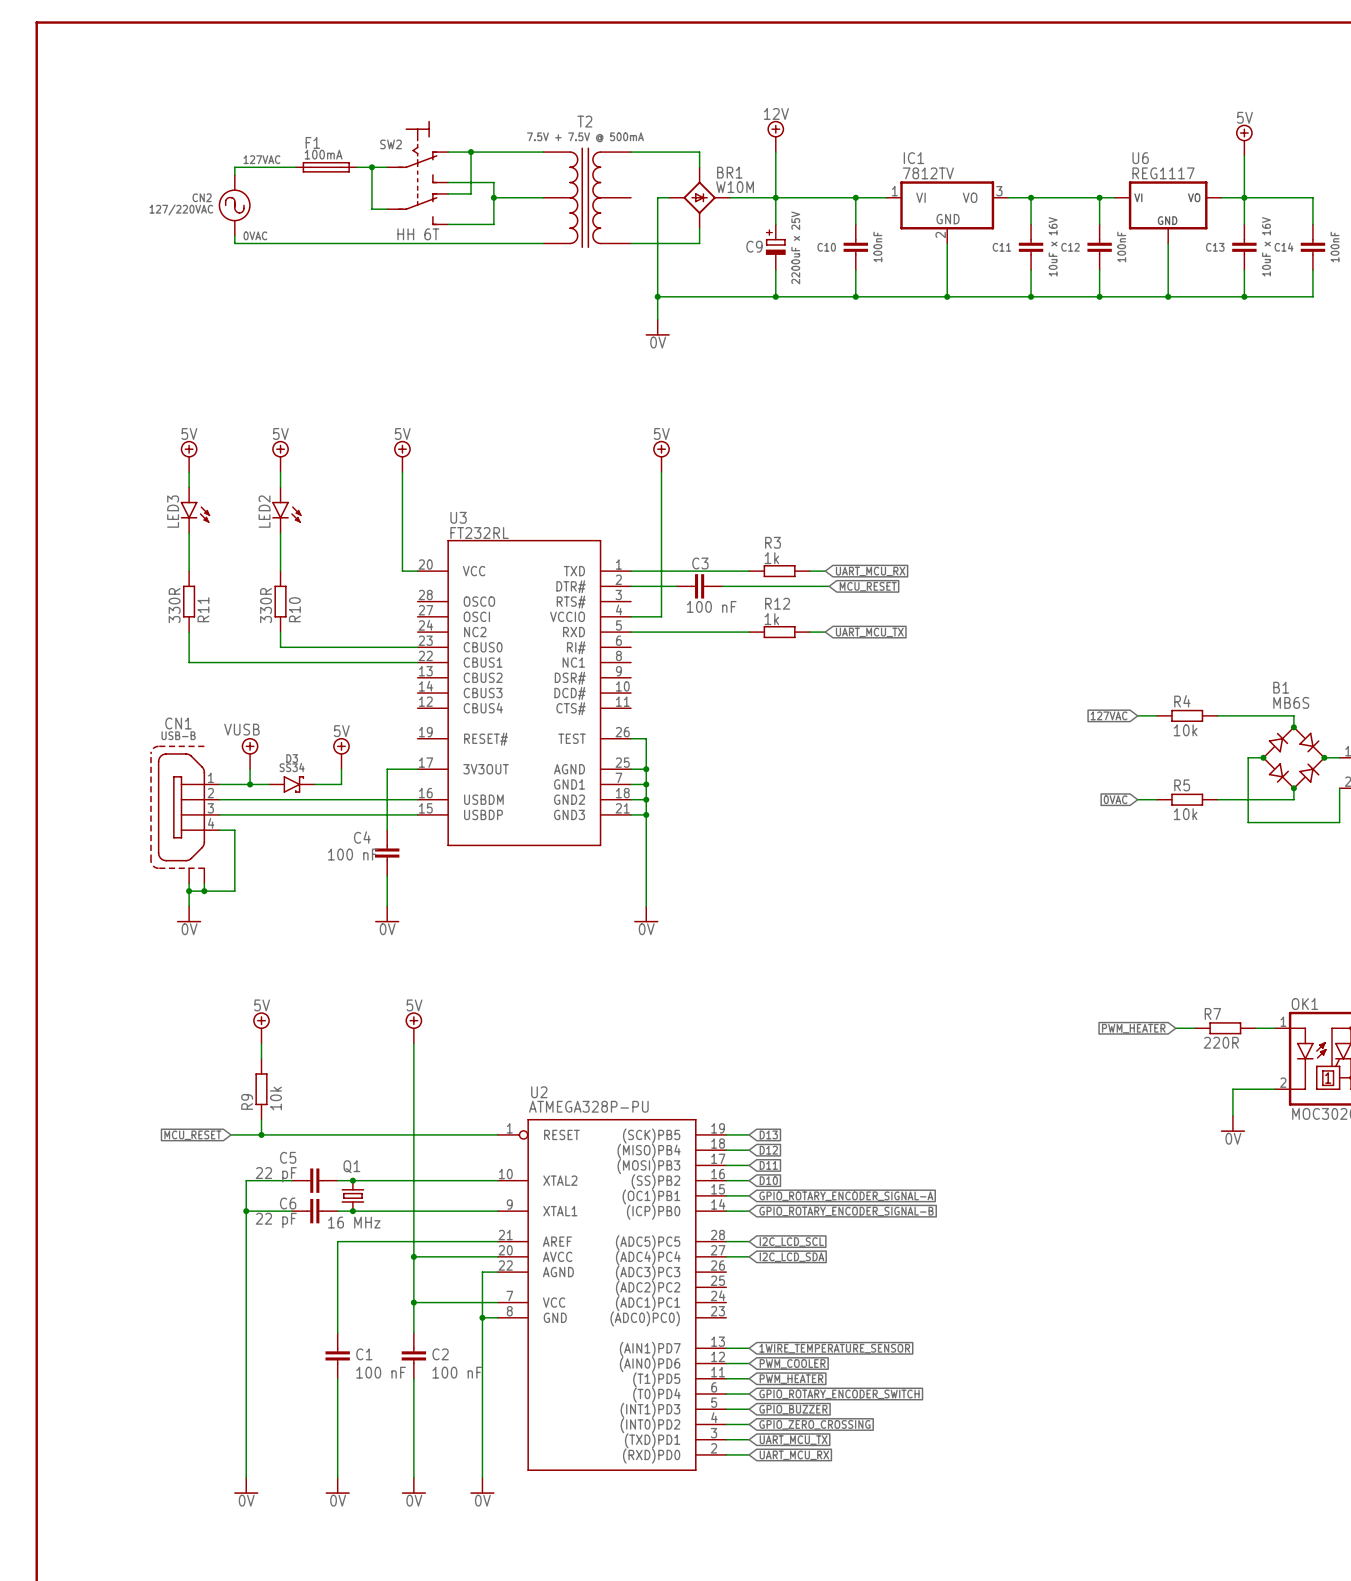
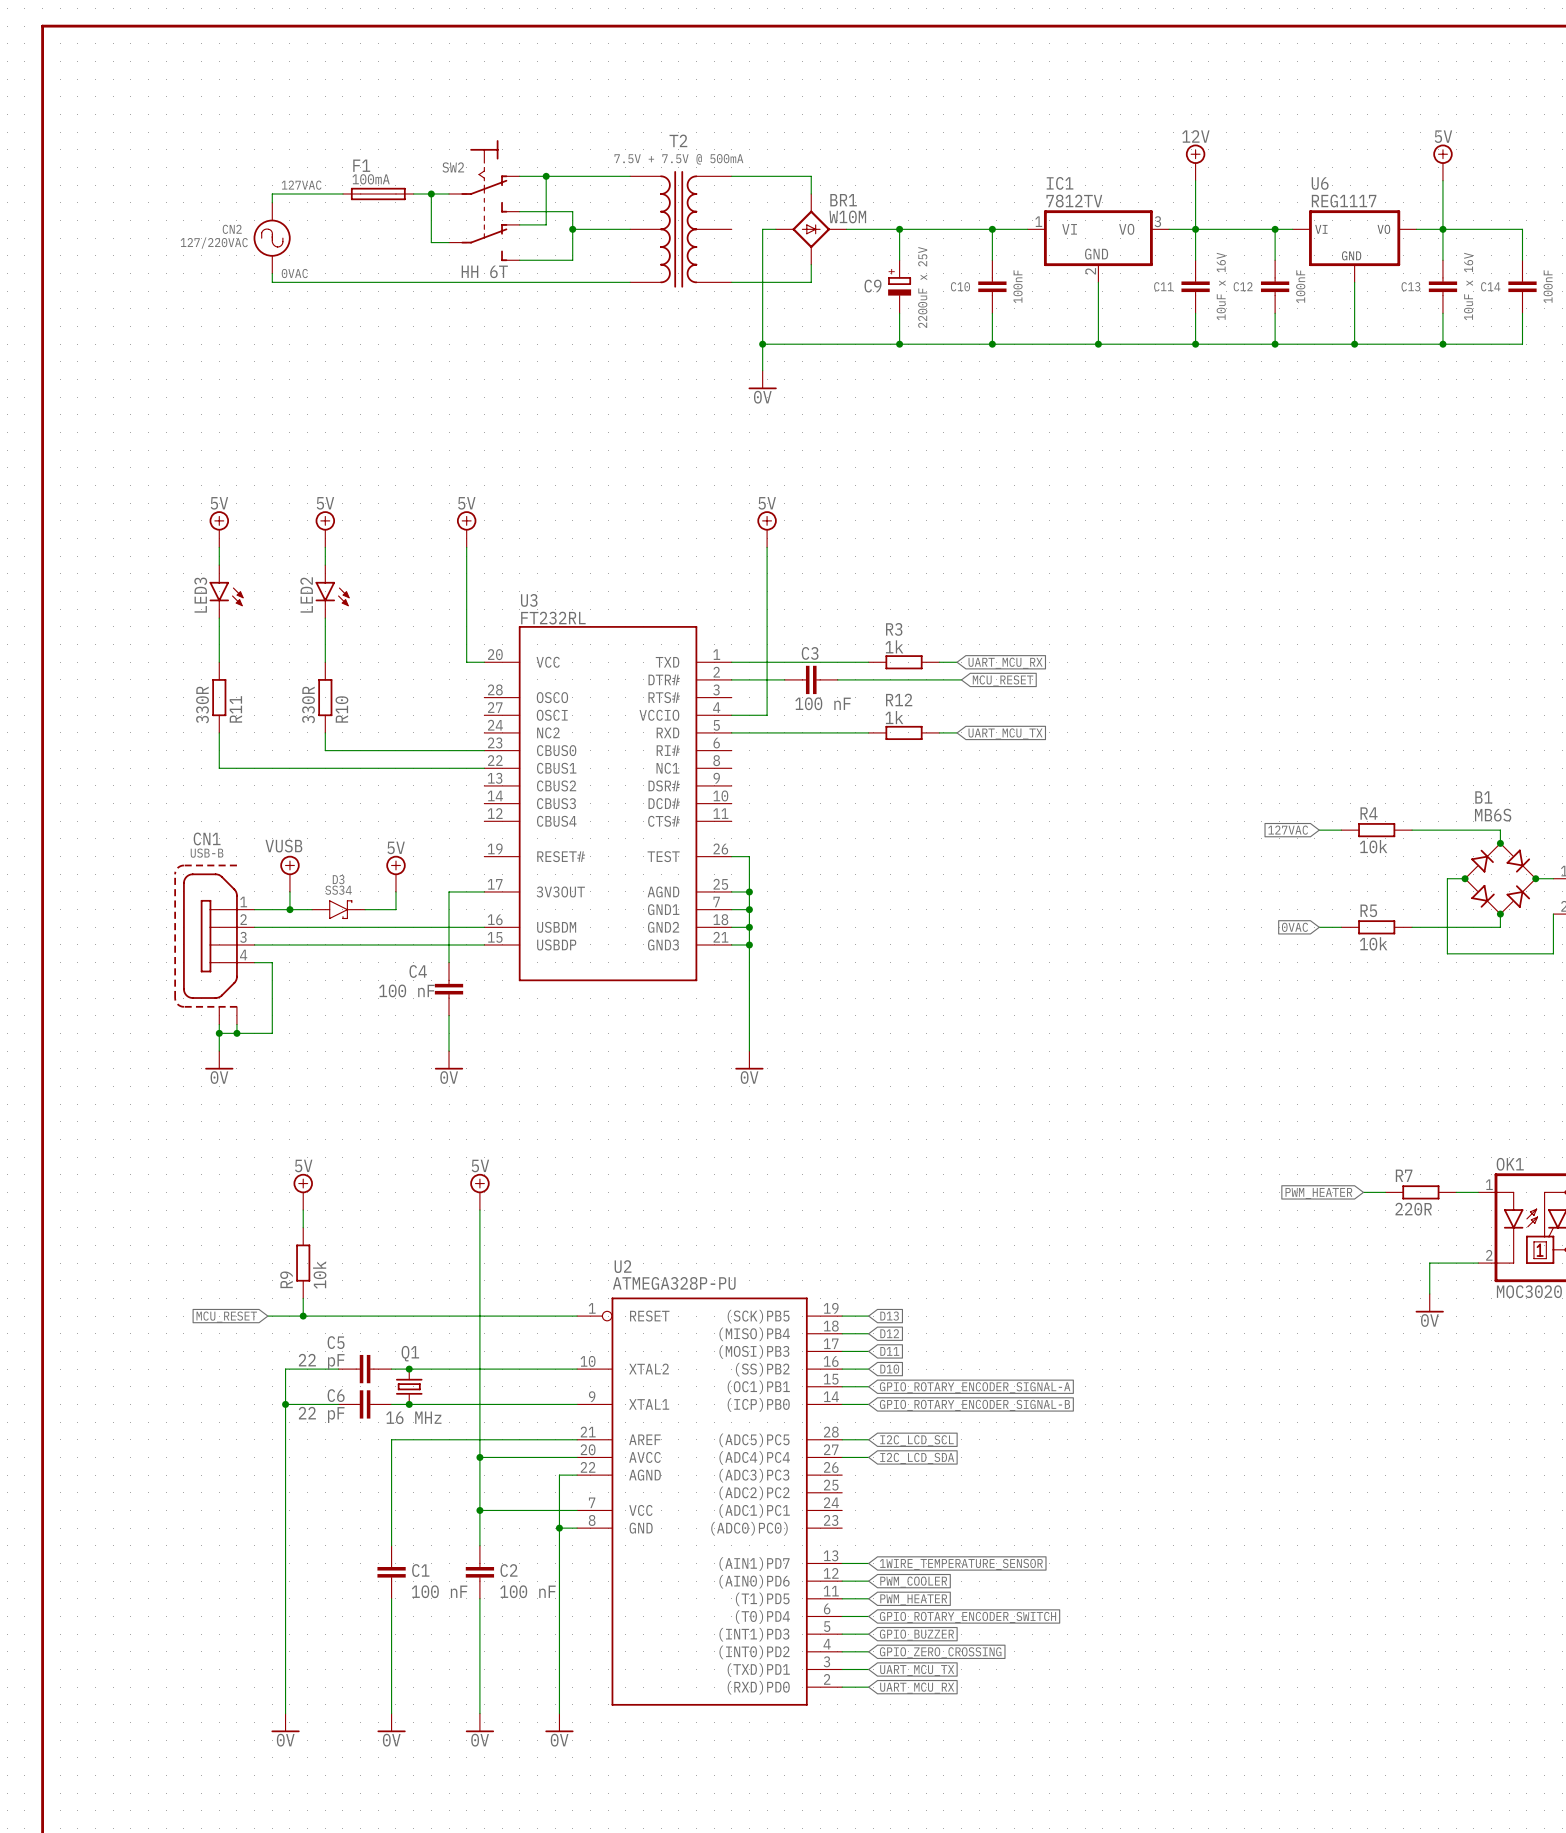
power symbol: 12V (775, 136) -> none
power symbol: none -> 12V (1195, 162)
wire: (775, 152) (775, 197) -> none
wire: none -> (1195, 180) (1195, 229)

